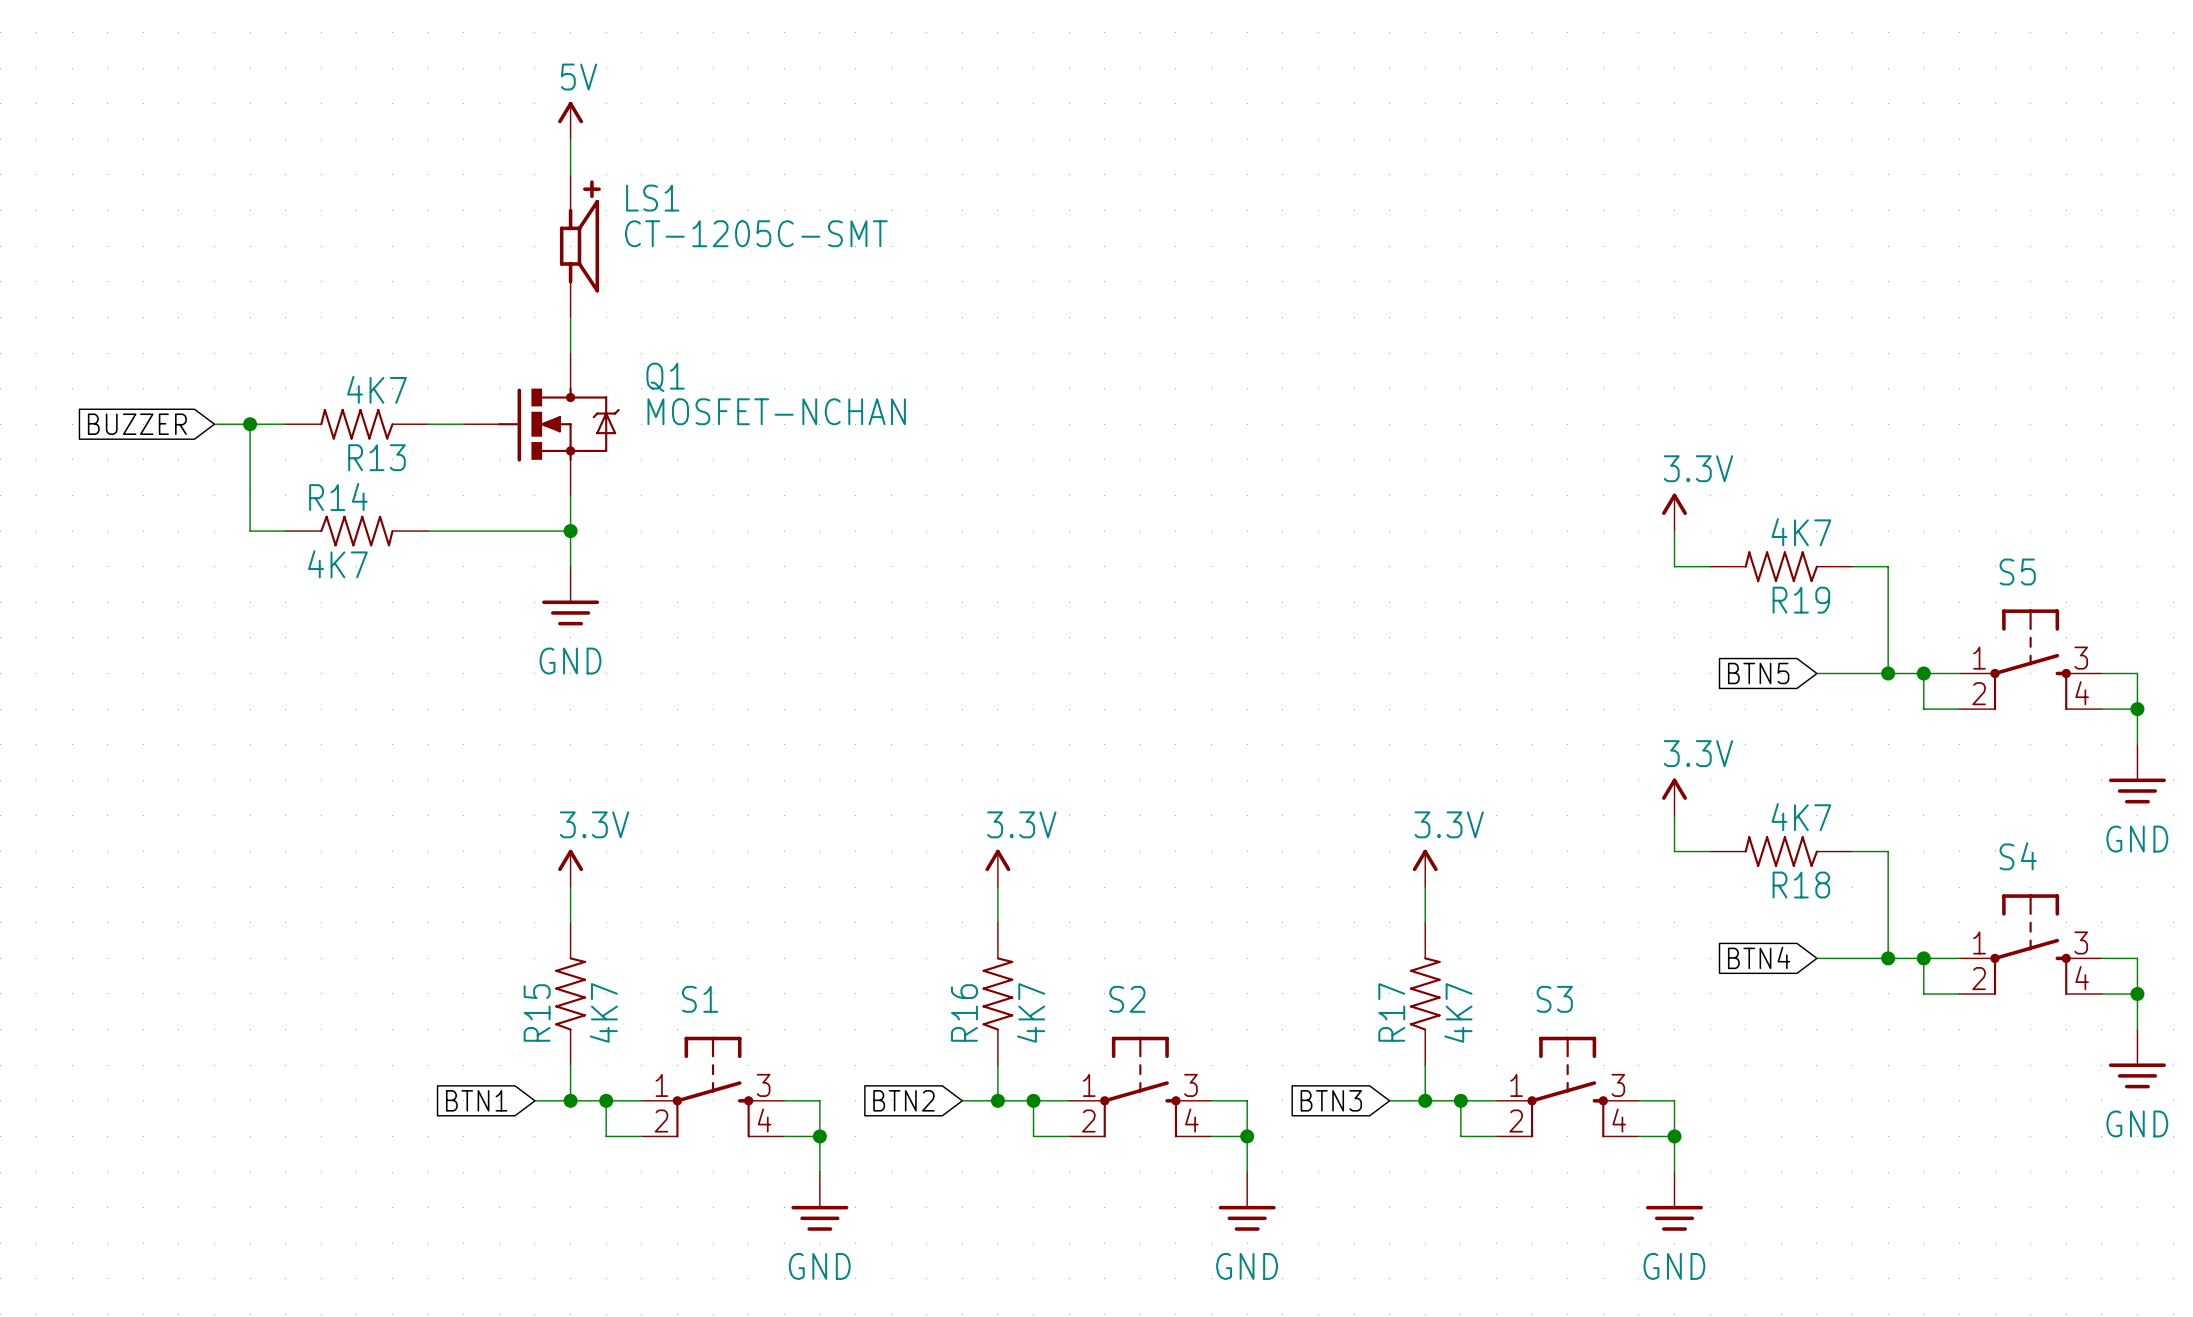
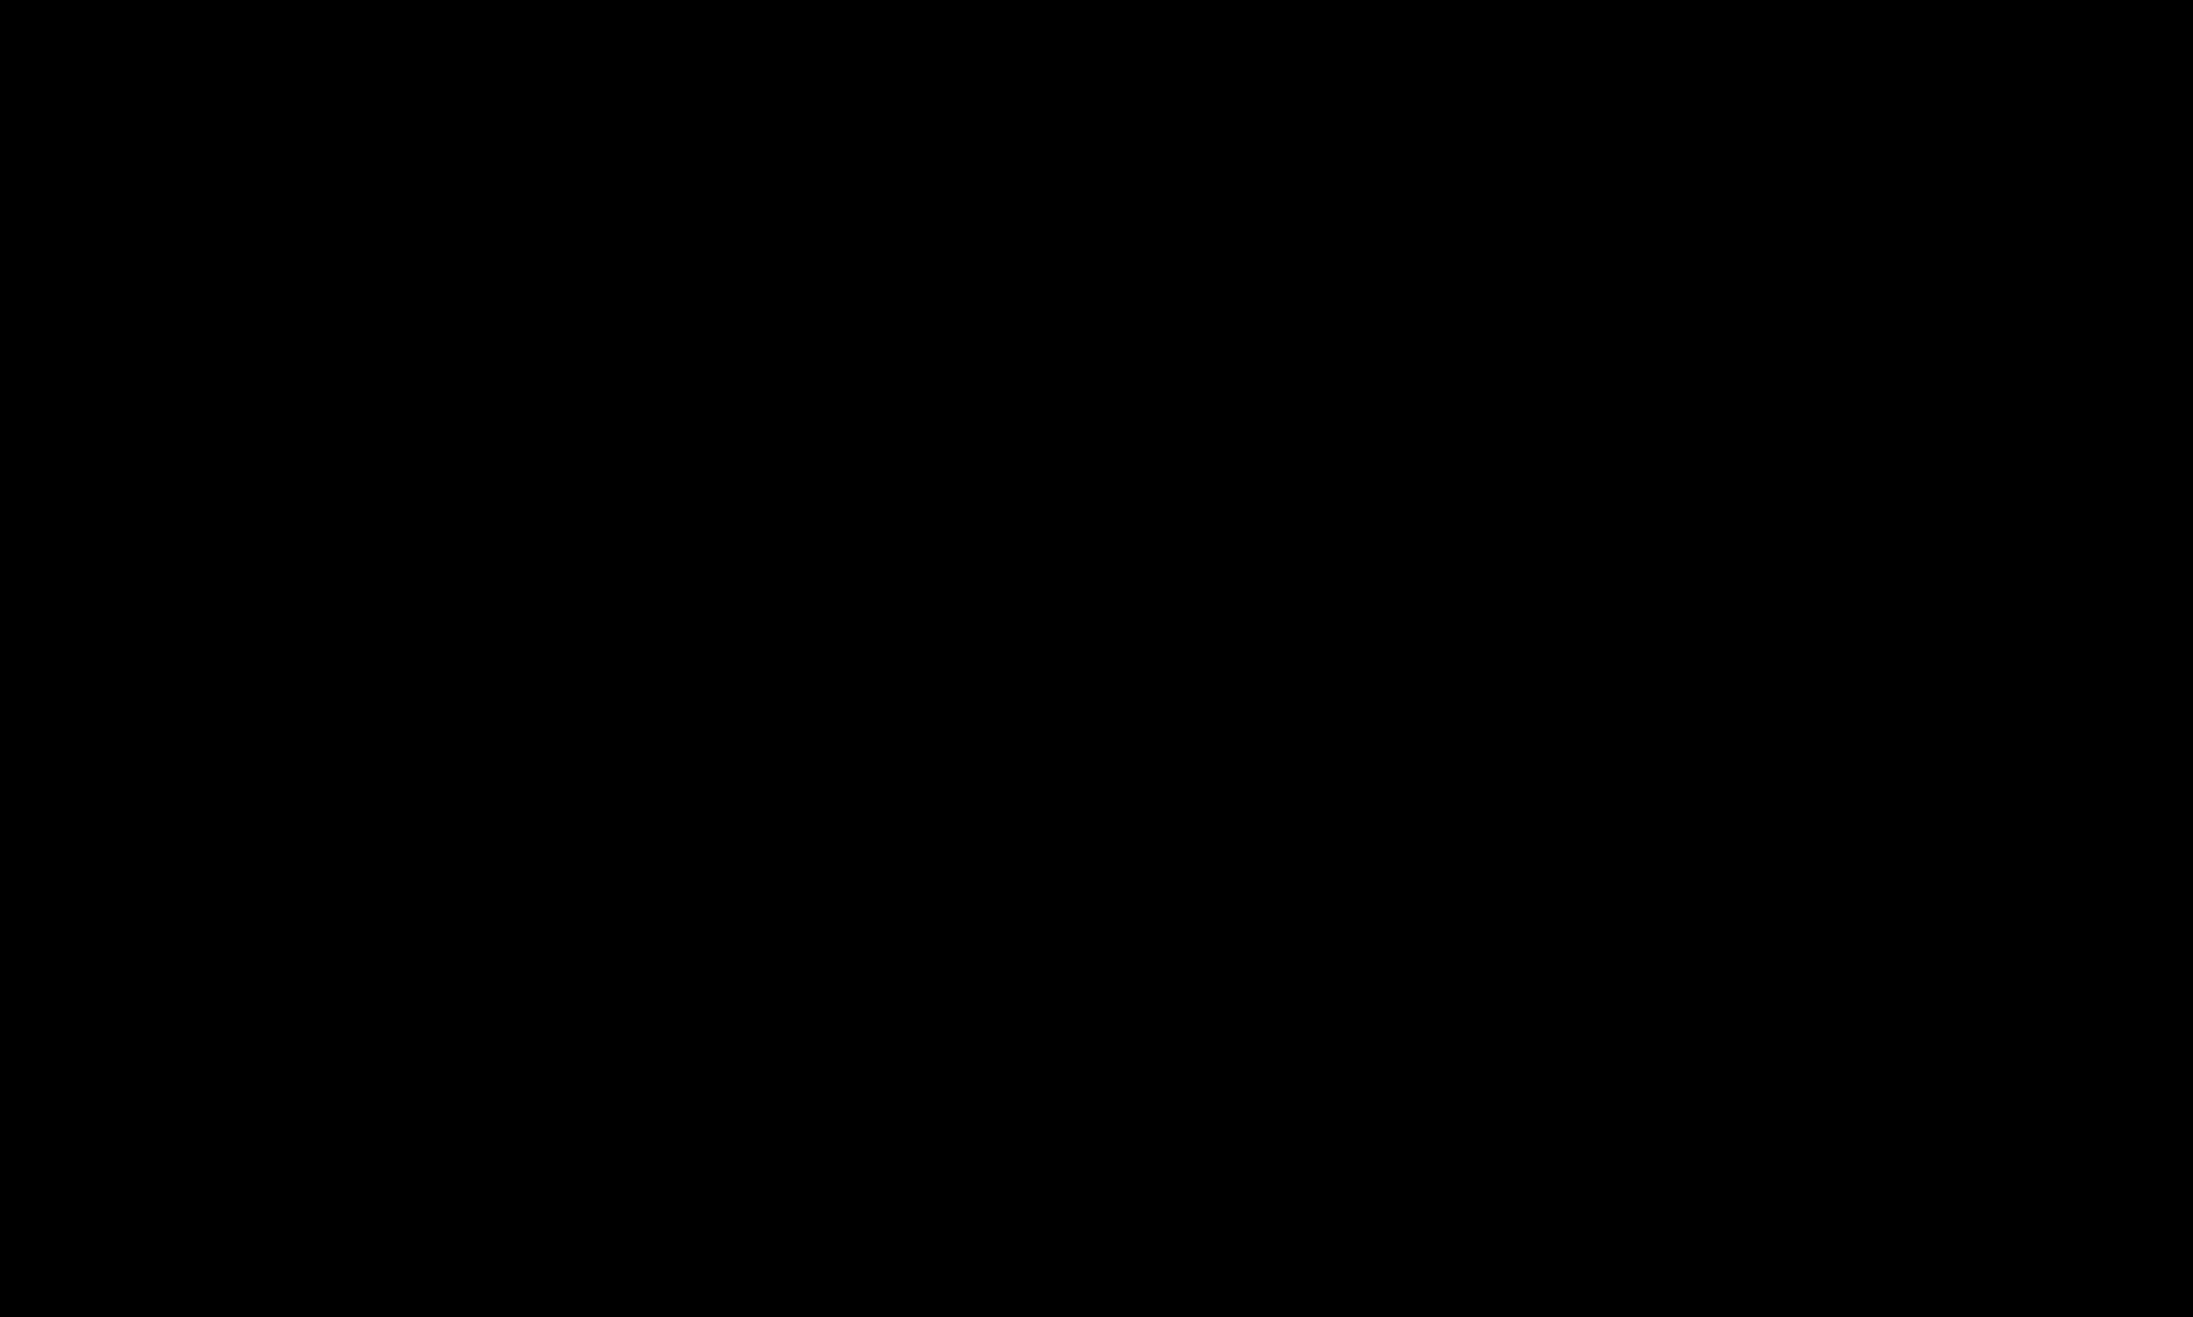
power symbol: 5V (570, 120) -> none
wire: (570, 139) (570, 174) -> none
LS1: CT-1205C-SMT (580, 246) -> none
wire: (570, 317) (570, 353) -> none
global label: BUZZER (137, 424) -> none
wire: (214, 424) (285, 424) -> none
wire: (250, 424) (250, 531) (285, 531) -> none
junction: (250, 424) -> none
R13: 4K7 (356, 424) -> none
wire: (428, 424) (463, 424) -> none
Q1: MOSFET-NCHAN (541, 424) -> none
wire: (570, 495) (570, 566) -> none
power symbol: 3.3V (1674, 512) -> none
R14: 4K7 (356, 531) -> none
wire: (428, 531) (570, 531) -> none
junction: (570, 531) -> none
wire: (1674, 531) (1674, 566) (1710, 566) -> none
R19: 4K7 (1781, 566) -> none
wire: (1852, 566) (1888, 566) (1888, 673) -> none
power symbol: GND (570, 596) -> none
S5: (2030, 659) -> none
global label: BTN5 (1758, 673) -> none
wire: (1816, 673) (1959, 673) -> none
junction: (1888, 673) -> none
wire: (1923, 673) (1923, 709) (1959, 709) -> none
junction: (1923, 673) -> none
wire: (2101, 673) (2137, 673) (2137, 744) -> none
wire: (2101, 709) (2137, 709) -> none
junction: (2137, 709) -> none
power symbol: GND (2137, 774) -> none
power symbol: 3.3V (1674, 797) -> none
wire: (1674, 815) (1674, 851) (1710, 851) -> none
R18: 4K7 (1781, 851) -> none
wire: (1852, 851) (1888, 851) (1888, 958) -> none
power symbol: 3.3V (570, 868) -> none
power symbol: 3.3V (997, 868) -> none
power symbol: 3.3V (1425, 868) -> none
wire: (570, 887) (570, 922) -> none
wire: (997, 887) (997, 922) -> none
wire: (1425, 887) (1425, 922) -> none
S4: (2030, 944) -> none
global label: BTN4 (1759, 957) -> none
wire: (1816, 958) (1959, 958) -> none
junction: (1888, 958) -> none
wire: (1923, 958) (1923, 993) (1959, 993) -> none
junction: (1923, 958) -> none
wire: (2101, 958) (2137, 958) (2137, 1029) -> none
R15: 4K7 (570, 993) -> none
R16: 4K7 (997, 993) -> none
R17: 4K7 (1425, 993) -> none
wire: (2101, 993) (2137, 993) -> none
junction: (2137, 993) -> none
power symbol: GND (2137, 1058) -> none
wire: (570, 1065) (570, 1100) -> none
wire: (997, 1065) (997, 1100) -> none
wire: (1425, 1065) (1425, 1100) -> none
S1: (713, 1087) -> none
S2: (1140, 1087) -> none
S3: (1567, 1087) -> none
global label: BTN1 (476, 1100) -> none
wire: (534, 1100) (641, 1100) -> none
junction: (570, 1100) -> none
wire: (606, 1100) (606, 1136) (641, 1136) -> none
junction: (606, 1100) -> none
wire: (784, 1100) (819, 1100) (819, 1172) -> none
global label: BTN2 (903, 1100) -> none
wire: (962, 1100) (1069, 1100) -> none
junction: (997, 1100) -> none
wire: (1033, 1100) (1033, 1136) (1069, 1136) -> none
junction: (1033, 1100) -> none
wire: (1211, 1100) (1247, 1100) (1247, 1172) -> none
global label: BTN3 (1331, 1100) -> none
wire: (1389, 1100) (1496, 1100) -> none
junction: (1425, 1100) -> none
wire: (1460, 1100) (1460, 1136) (1496, 1136) -> none
junction: (1460, 1100) -> none
wire: (1638, 1100) (1674, 1100) (1674, 1172) -> none
wire: (784, 1136) (819, 1136) -> none
junction: (819, 1136) -> none
wire: (1211, 1136) (1247, 1136) -> none
junction: (1247, 1136) -> none
wire: (1638, 1136) (1674, 1136) -> none
junction: (1674, 1136) -> none
power symbol: GND (819, 1201) -> none
power symbol: GND (1247, 1201) -> none
power symbol: GND (1674, 1201) -> none

